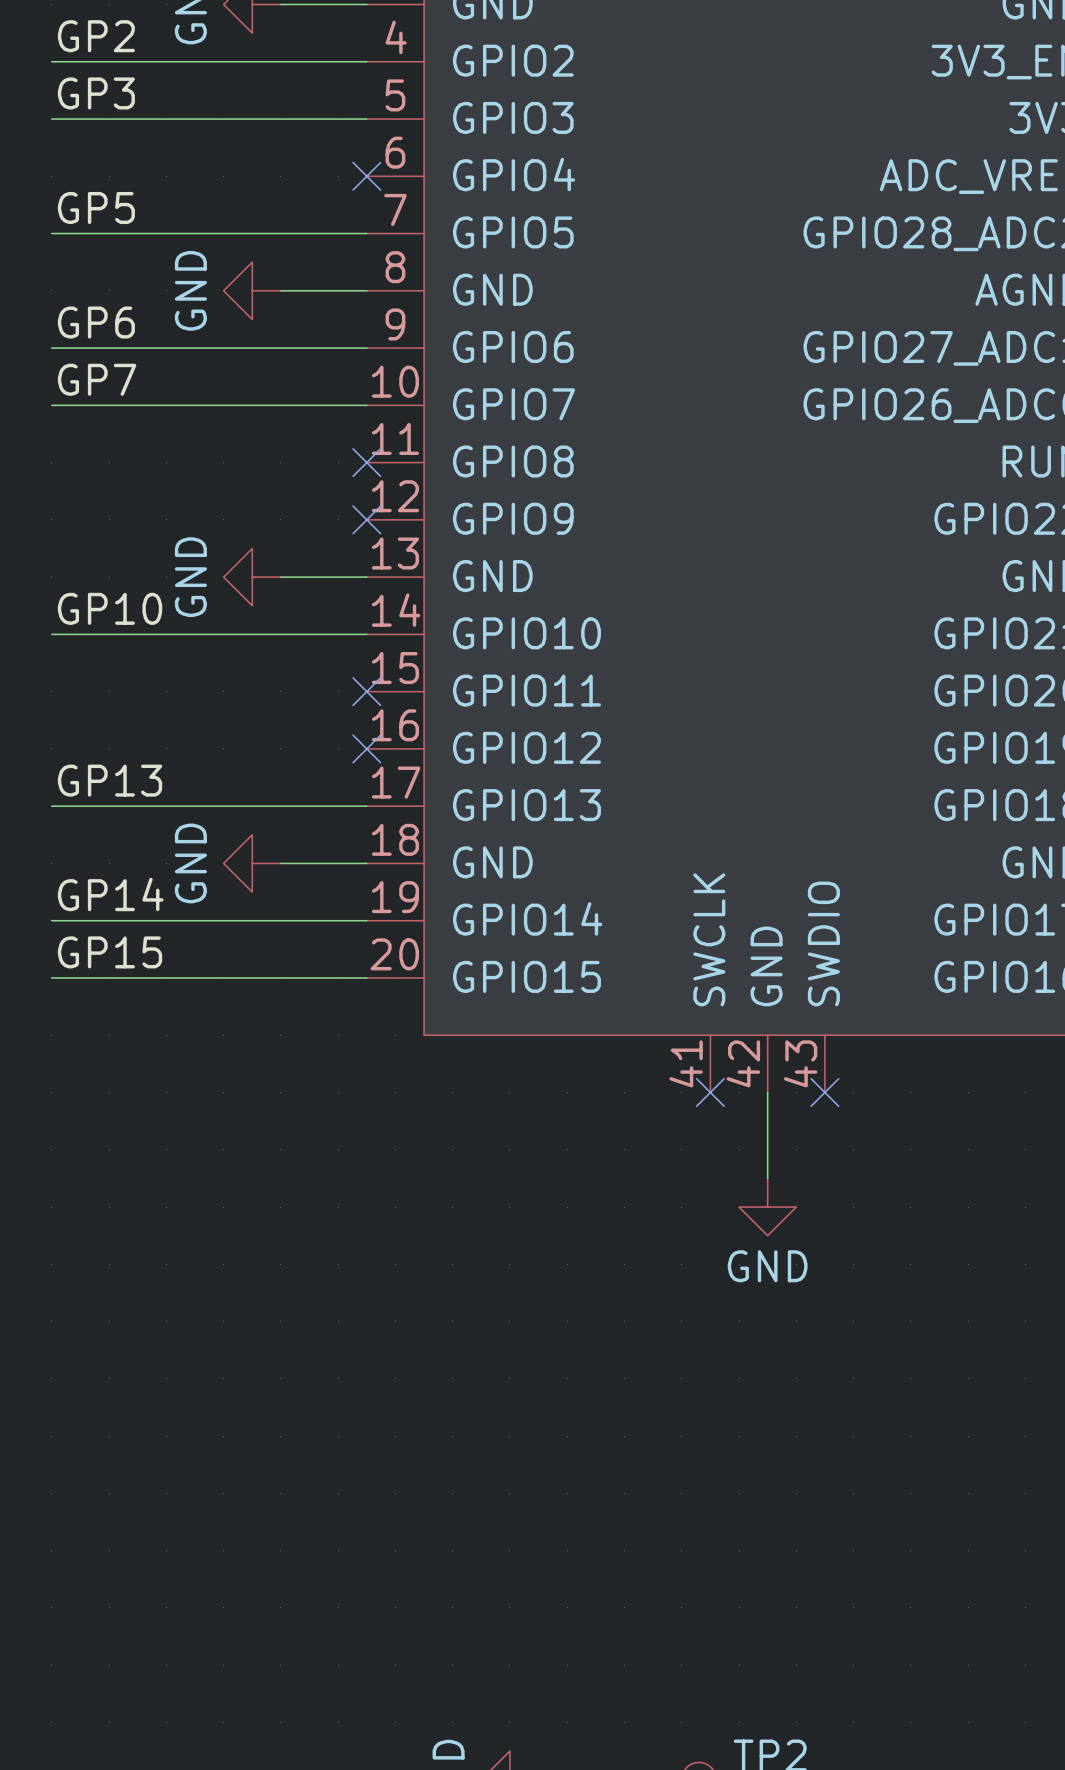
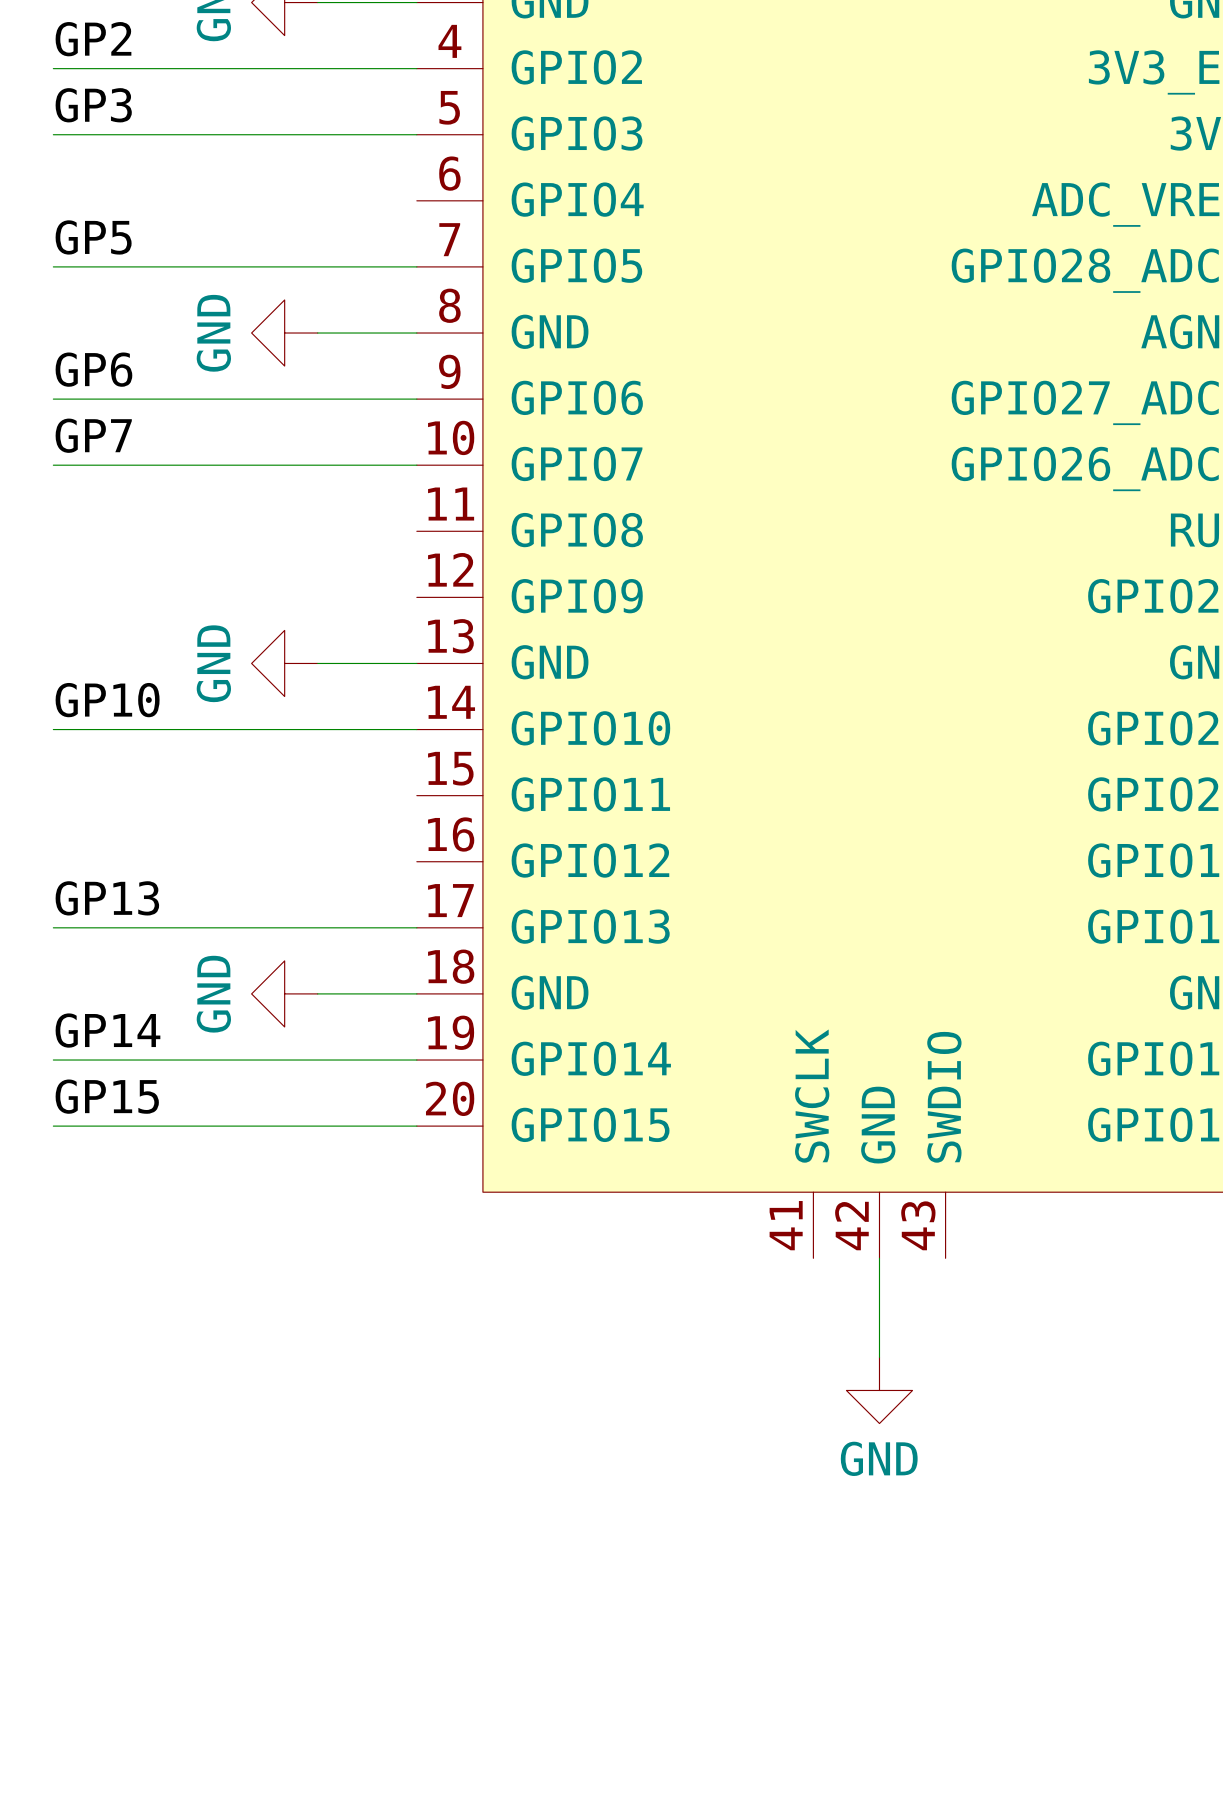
no-connect mark: (366, 176) -> none
no-connect mark: (366, 462) -> none
no-connect mark: (366, 519) -> none
no-connect mark: (366, 691) -> none
no-connect mark: (366, 748) -> none
no-connect mark: (710, 1092) -> none
no-connect mark: (824, 1092) -> none

